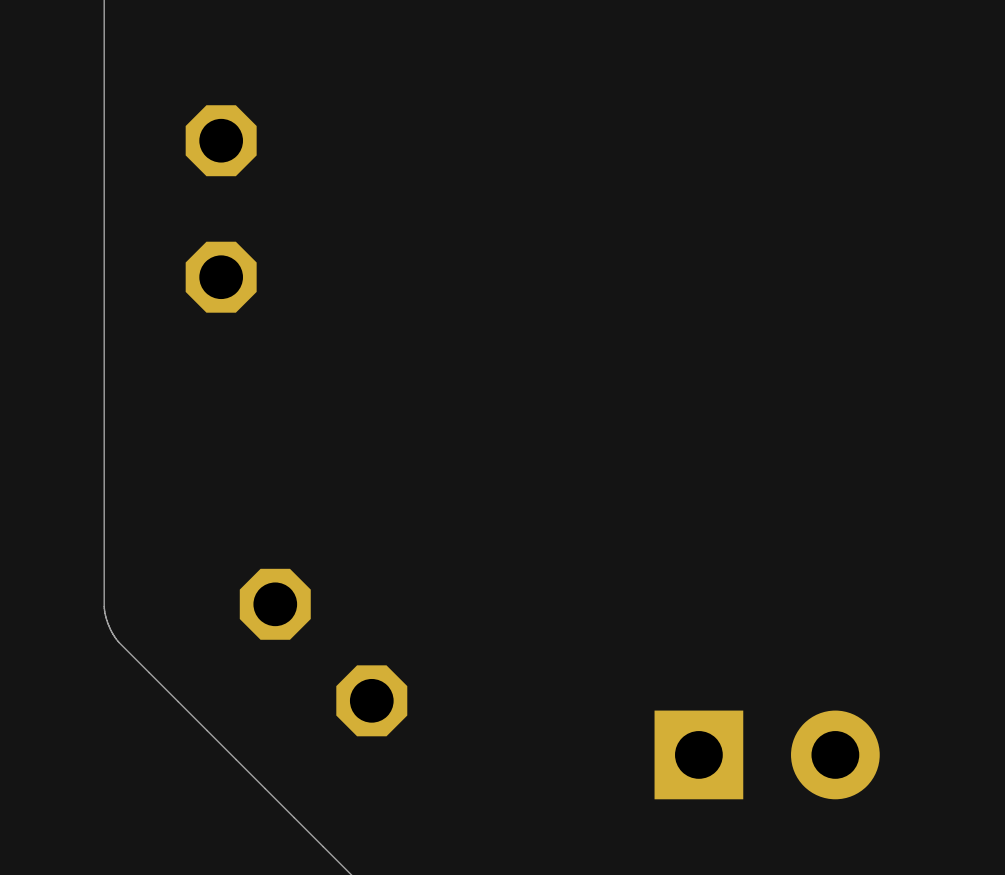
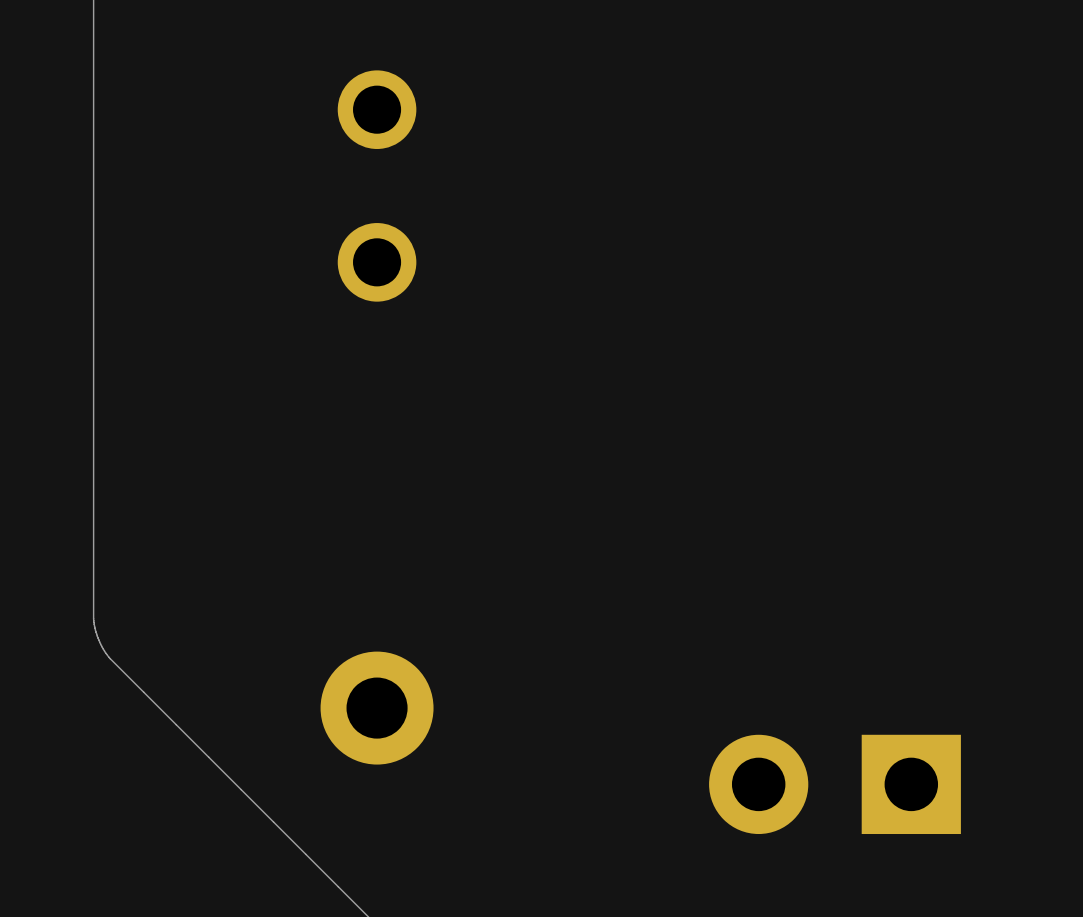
part: (221, 208) -> none
part: none -> (377, 186)
part footprint: [239, 568, 408, 737] -> [320, 651, 434, 765]
part rotation: 0° (767, 754) -> 180° (835, 784)

